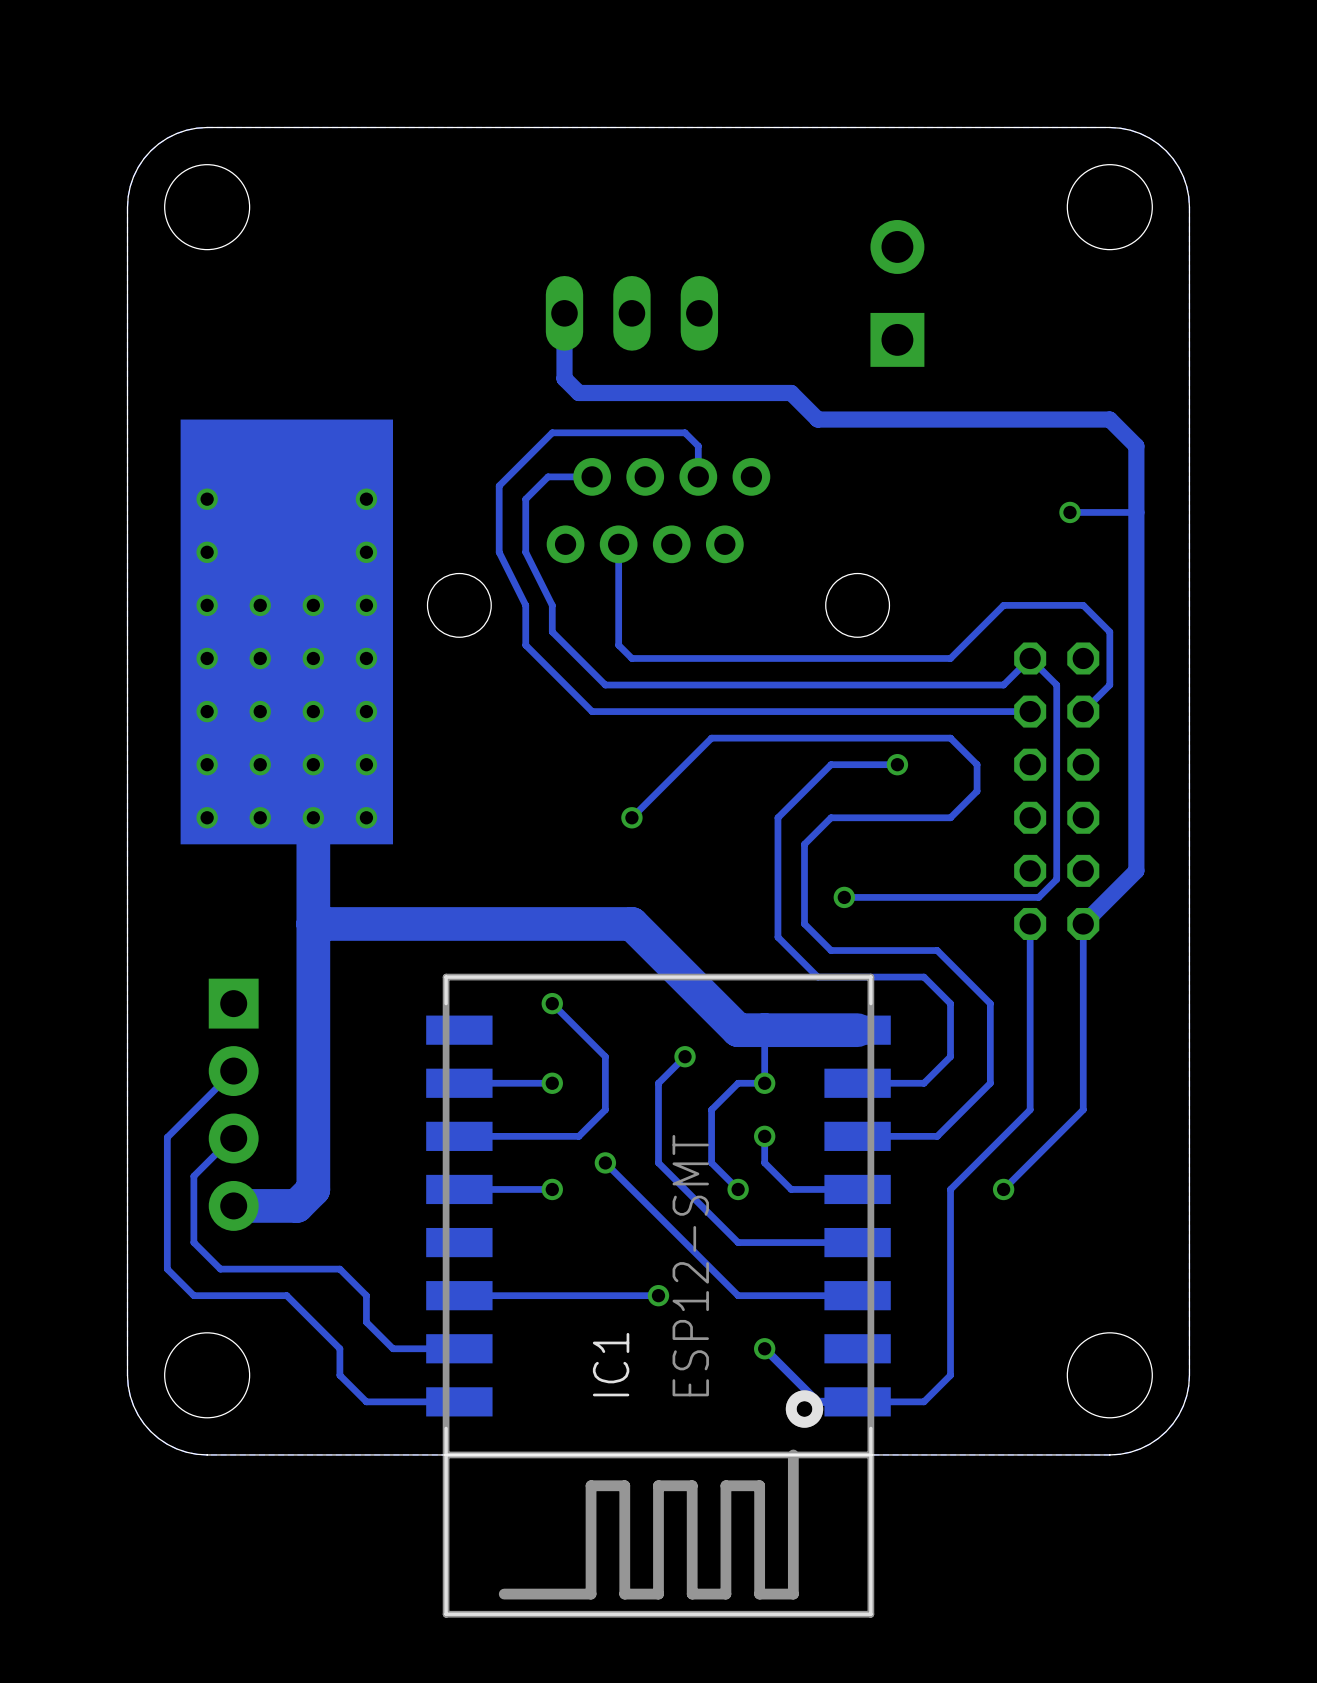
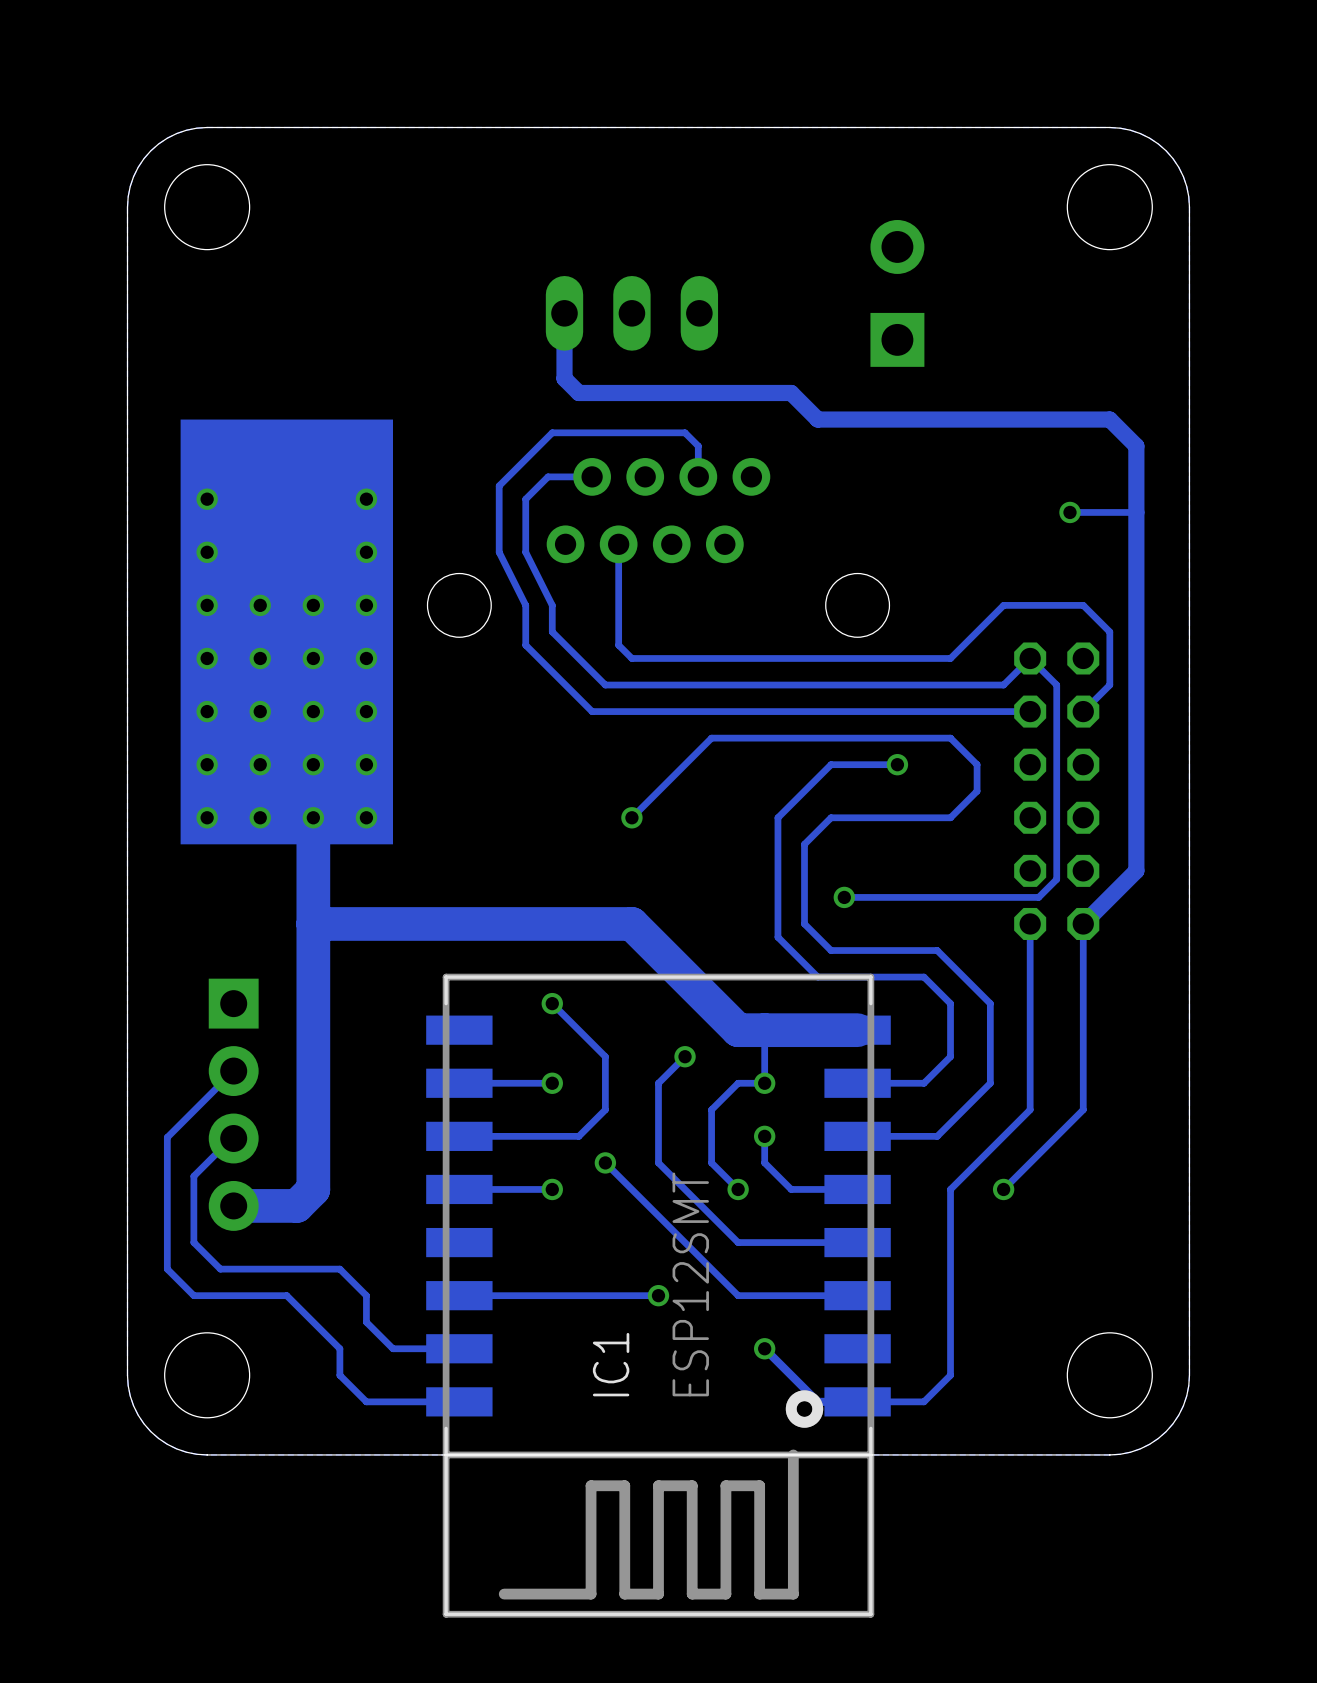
IC1 value: ESP12-SMT (690, 1265) -> ESP12SMT (690, 1284)

